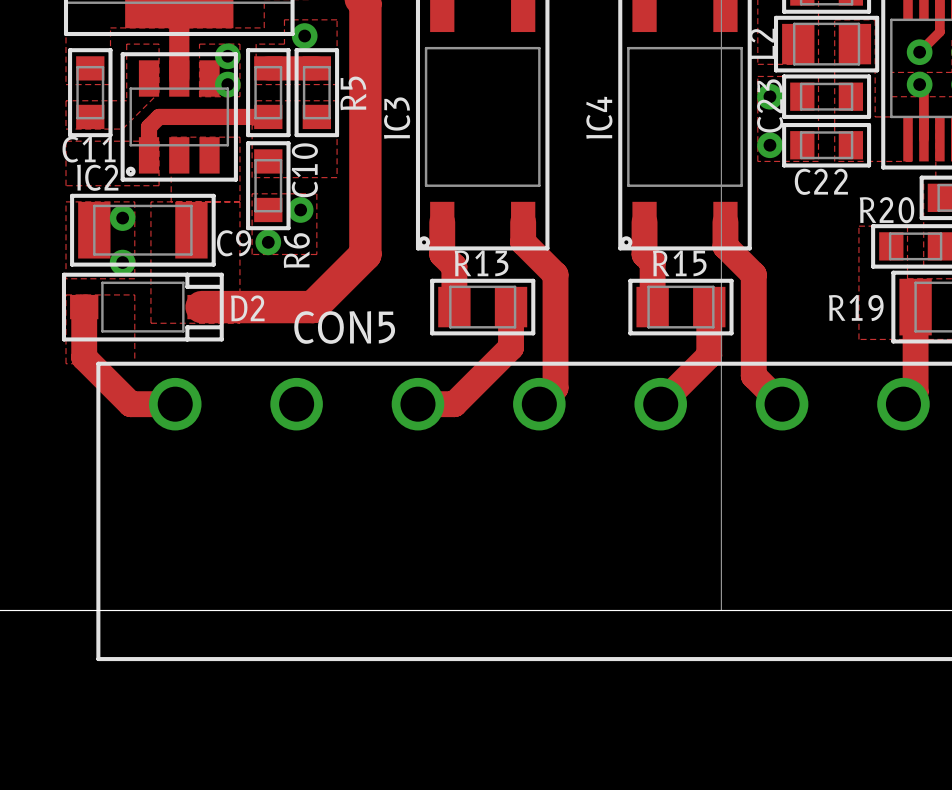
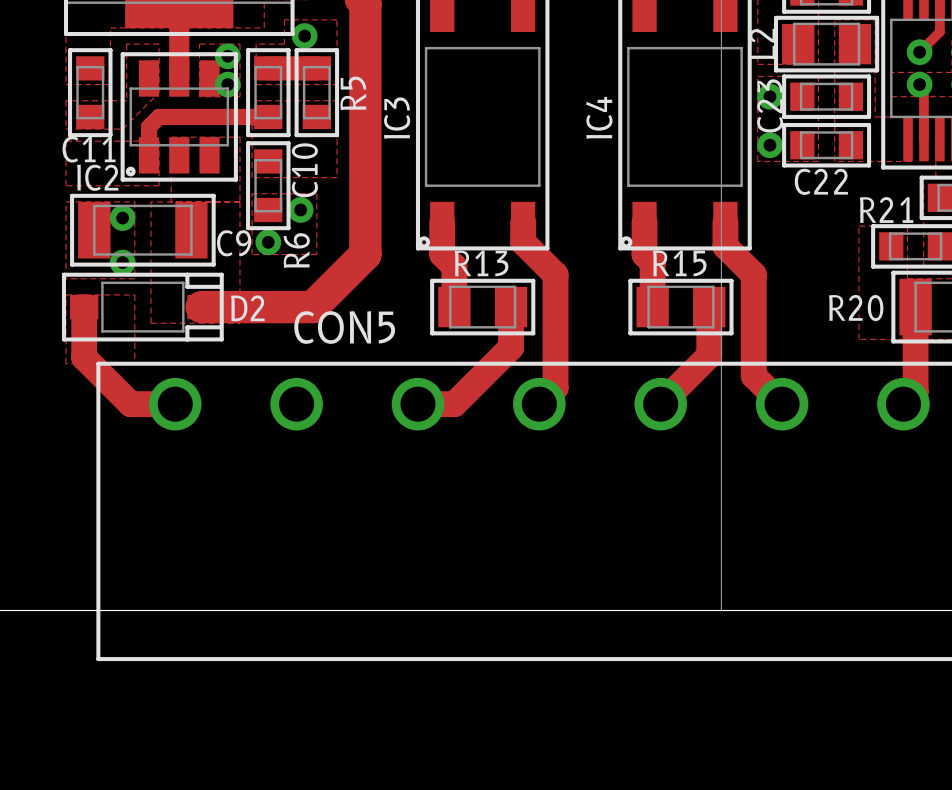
R20 name: R20 (887, 210) -> R21 (886, 209)
R19 name: R19 (856, 308) -> R20 (856, 308)

